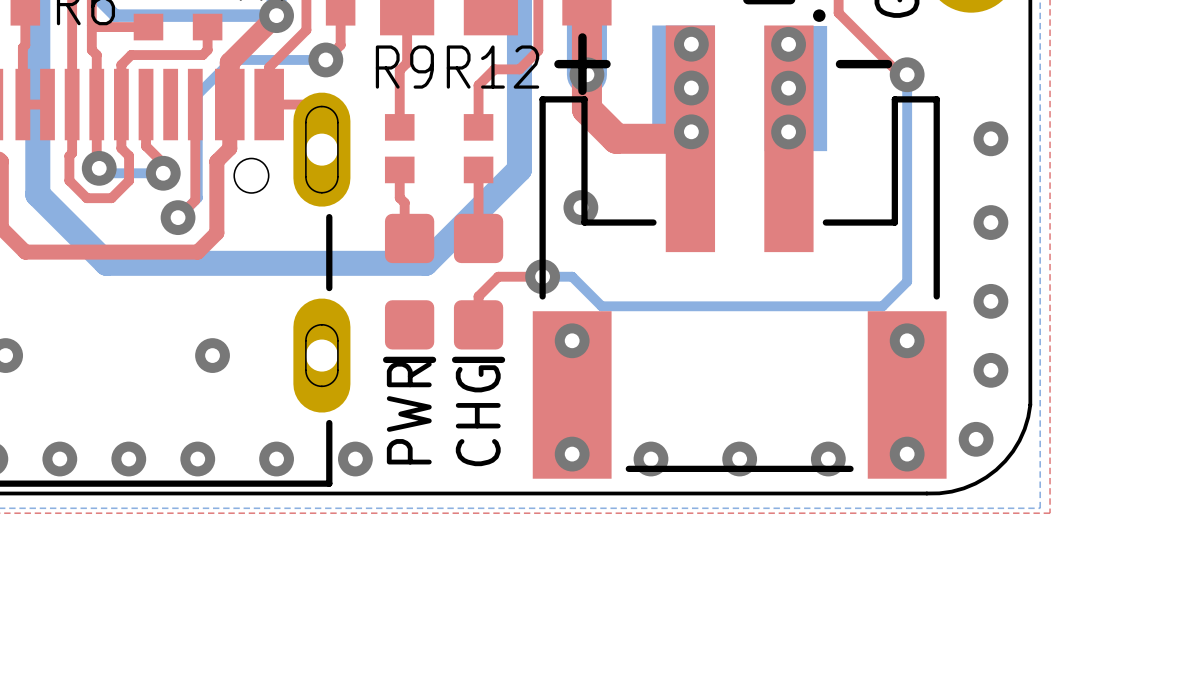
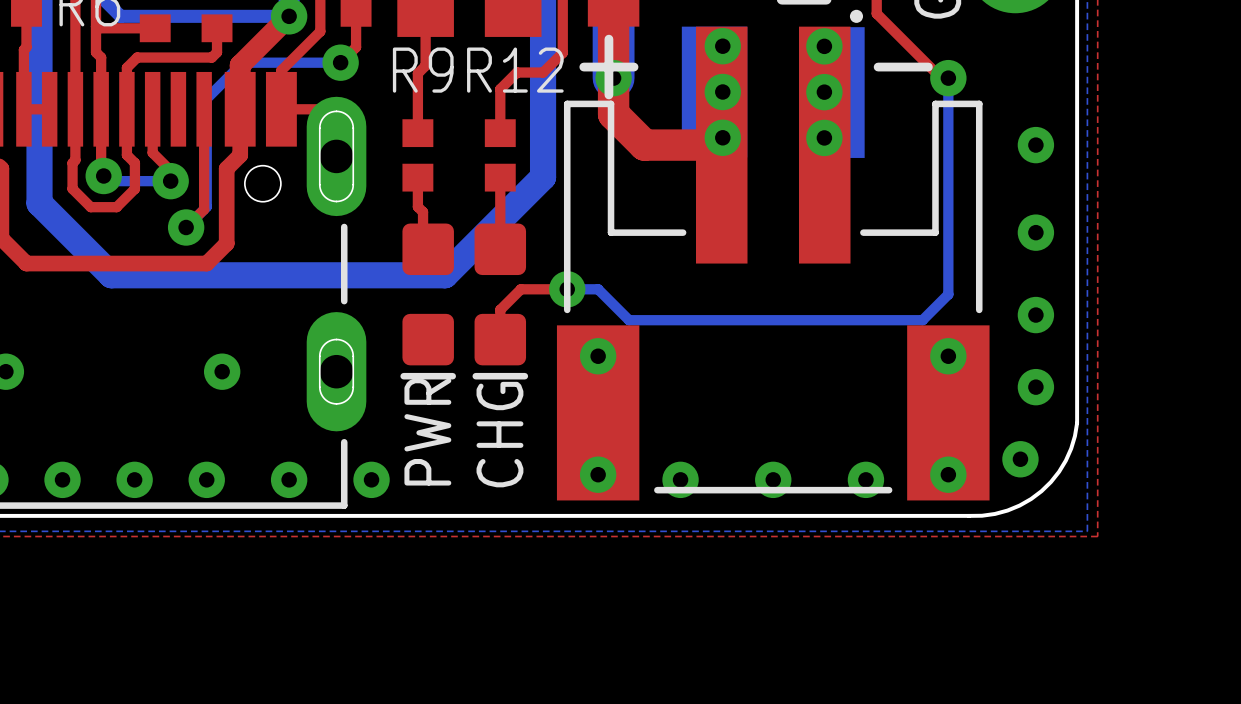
via: (580, 207) -> none

